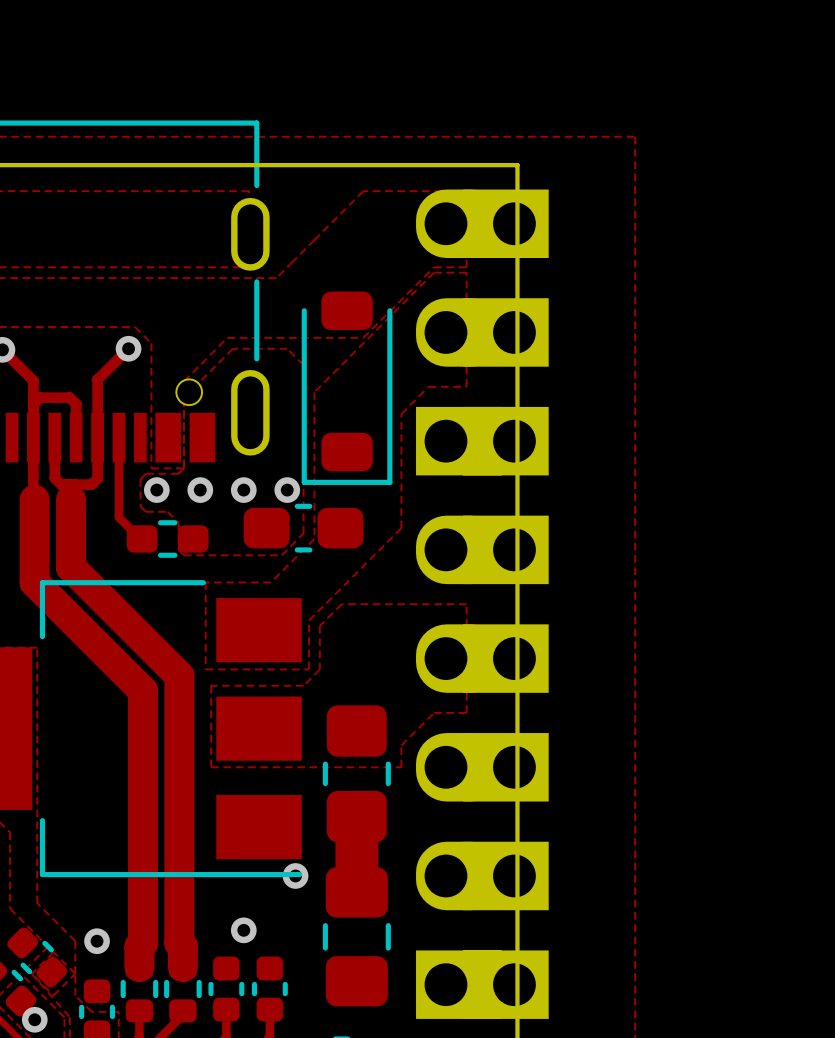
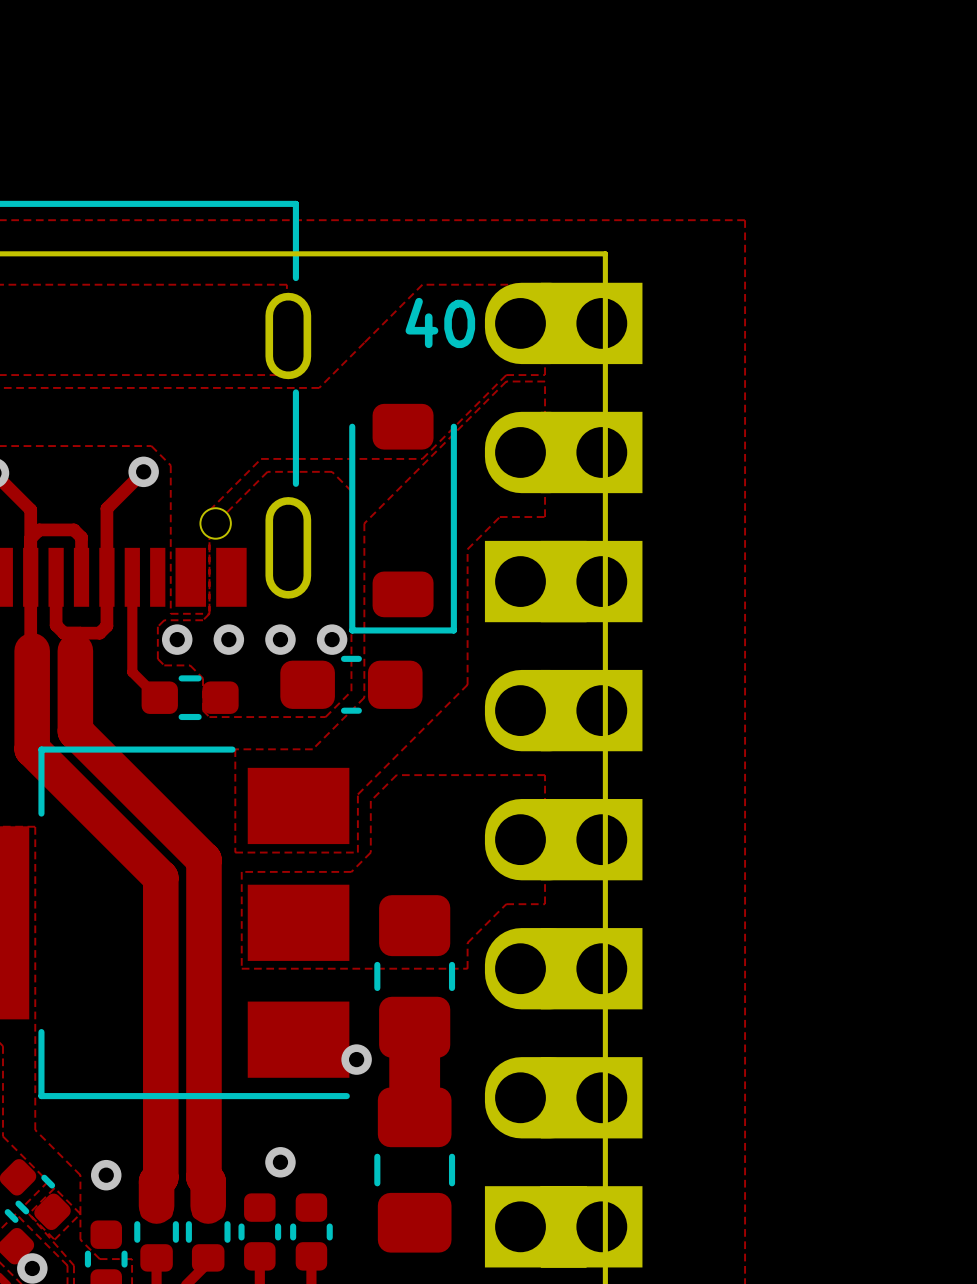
text: none -> 40 (440, 322)
via position: (295, 875) -> (356, 1059)

